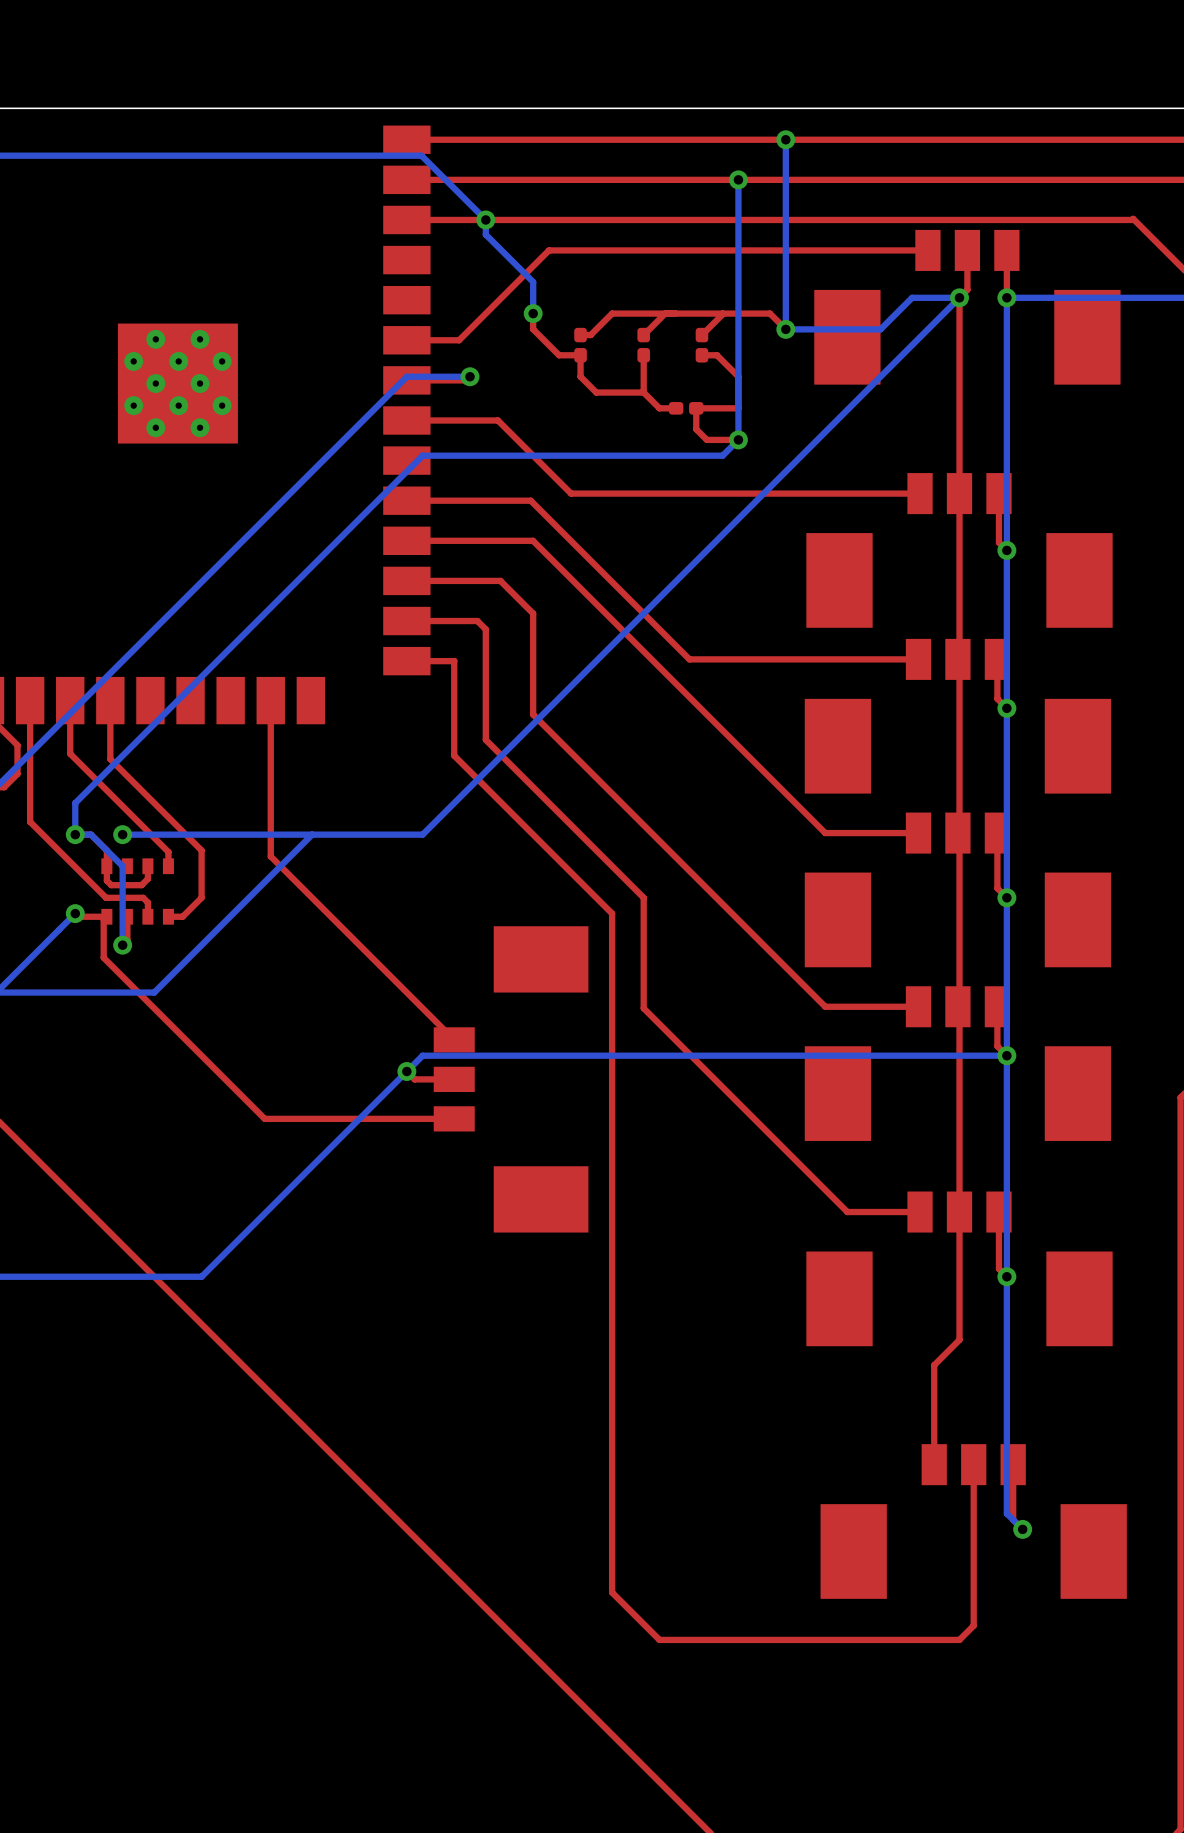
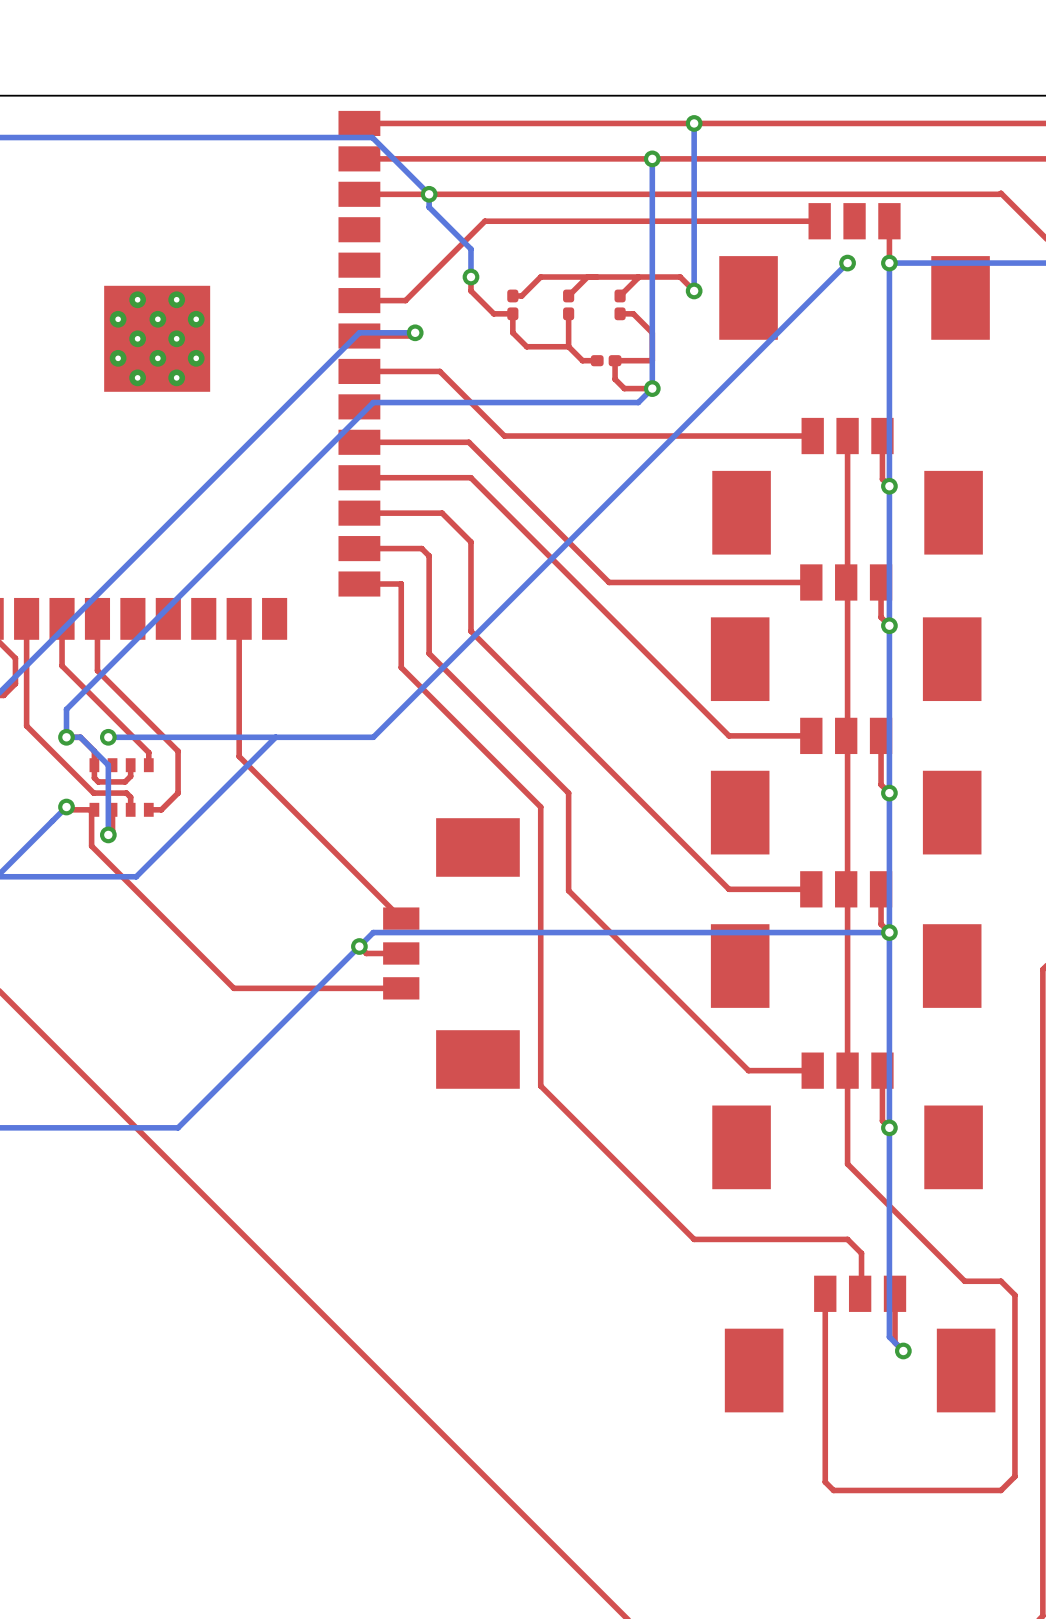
top track: (967, 250) (967, 289) (959, 297) (959, 493) -> none
bottom track: (959, 297) (912, 297) (880, 329) (785, 329) -> none
top track: (612, 1229) (612, 1592) (659, 1639) (959, 1639) (973, 1625) (973, 1464) -> (540, 1085) (694, 1239) (847, 1239) (861, 1253) (861, 1285)
top track: (959, 1317) (959, 1339) (934, 1365) (934, 1464) -> (847, 1164) (964, 1281) (1001, 1281) (1014, 1295) (1014, 1476) (1001, 1490) (833, 1490) (825, 1482) (825, 1293)

